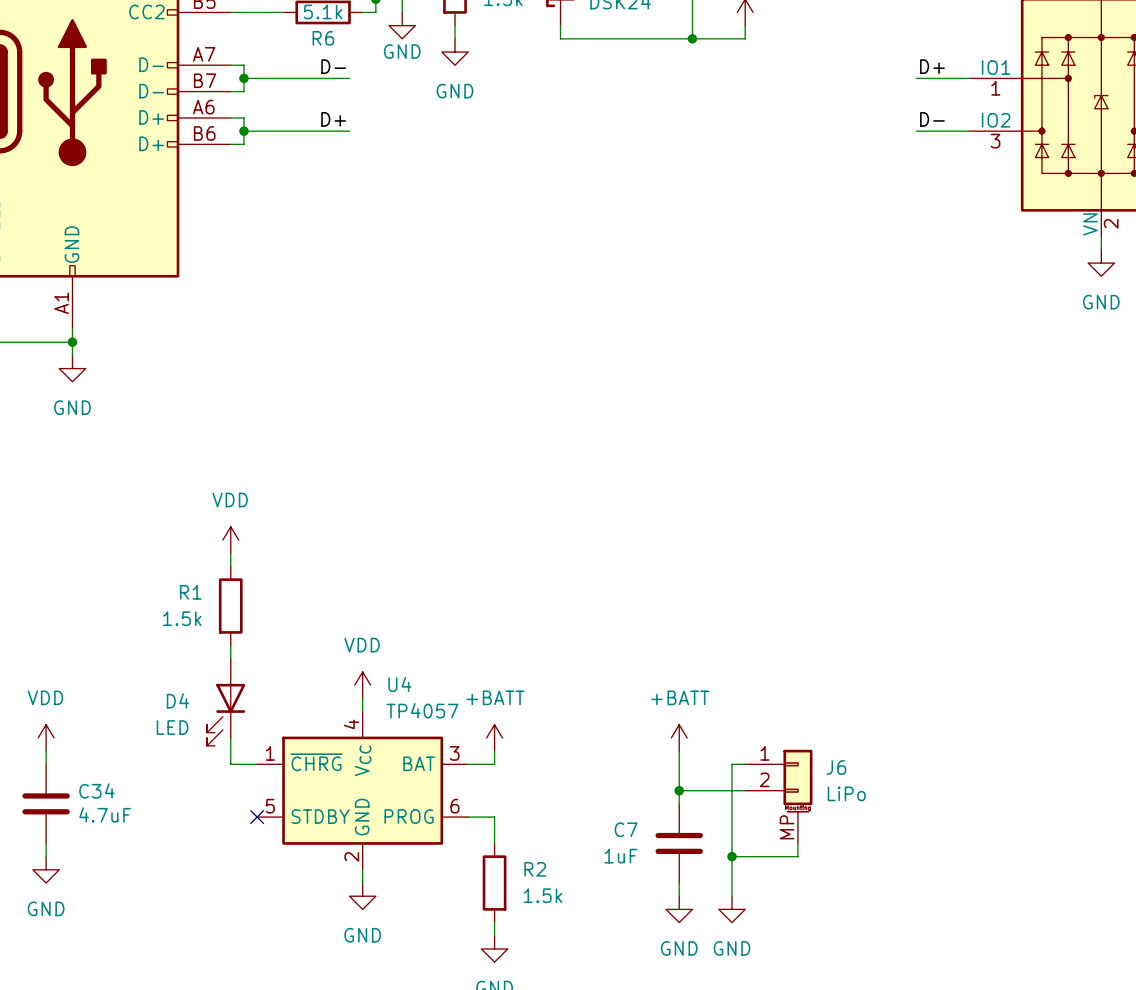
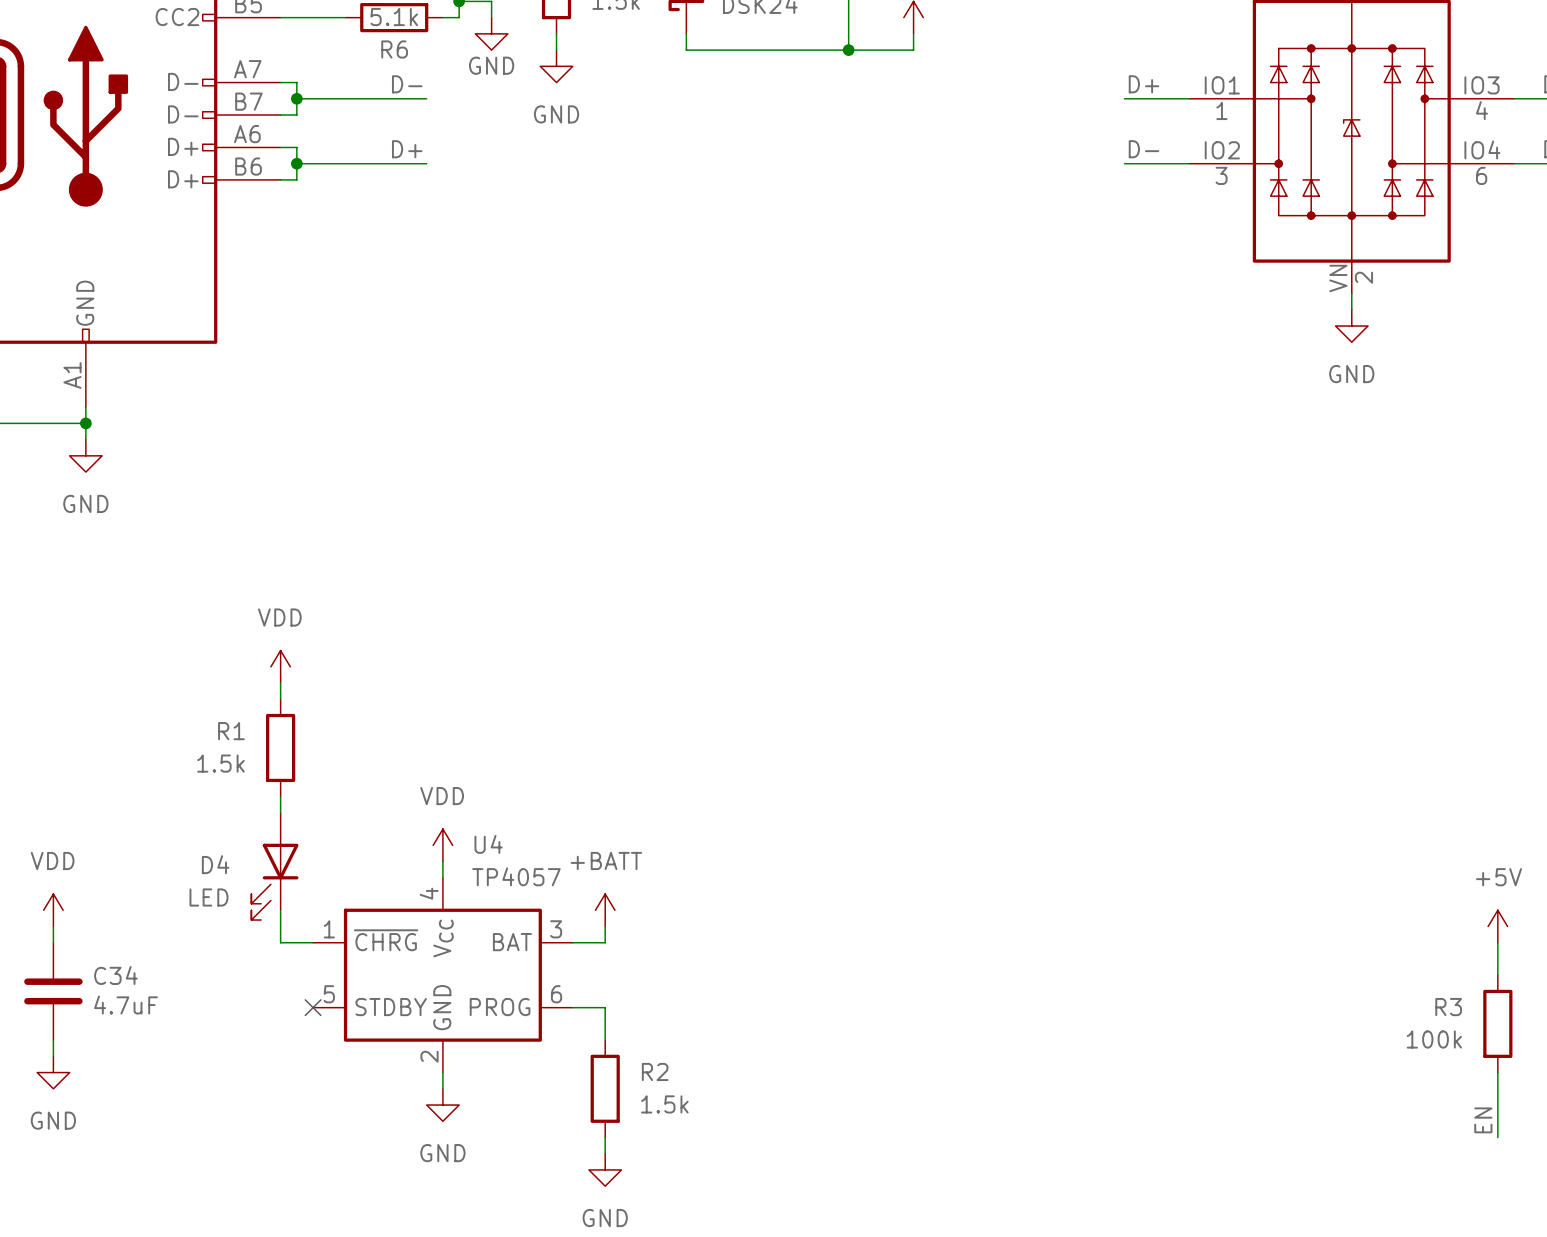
power symbol: +BATT (679, 737) -> none
wire: (679, 751) (679, 803) -> none
wire: (745, 764) (731, 764) (731, 896) -> none
wire: (679, 790) (745, 790) -> none
junction: (679, 790) -> none
J6: LiPo (778, 796) -> none
C7: 1uF (679, 843) -> none
wire: (797, 843) (797, 856) (731, 856) -> none
junction: (731, 856) -> none
wire: (679, 883) (679, 896) -> none
power symbol: GND (679, 909) -> none
power symbol: GND (731, 909) -> none

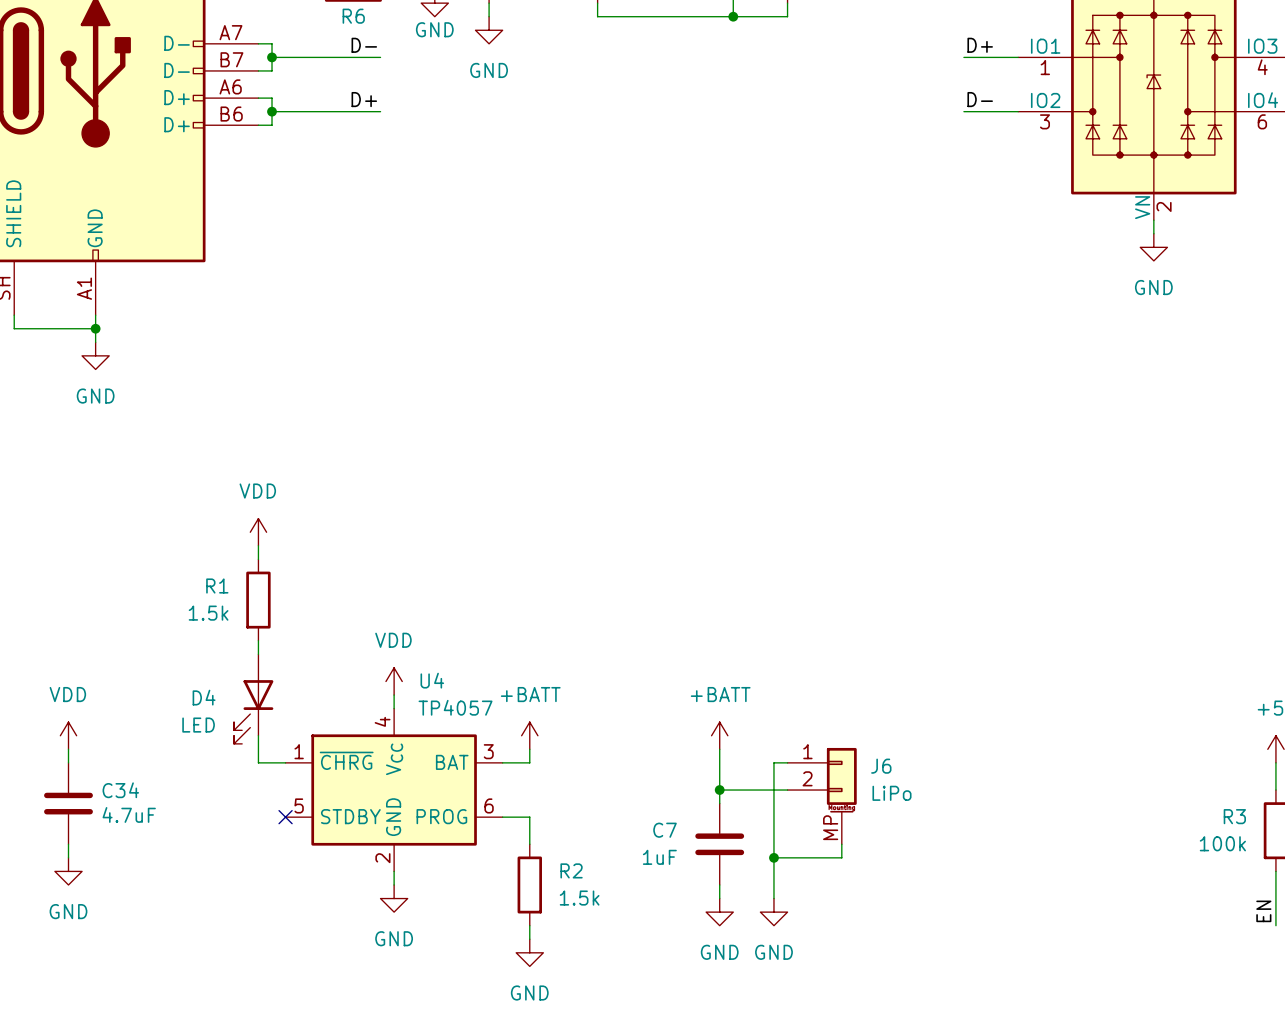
power symbol: none -> +BATT (719, 735)
wire: none -> (719, 749) (719, 803)
wire: none -> (787, 762) (773, 762) (773, 898)
wire: none -> (719, 790) (787, 790)
junction: none -> (719, 790)
J6: none -> LiPo (822, 796)
C7: none -> 1uF (719, 844)
wire: none -> (841, 844) (841, 857) (773, 857)
junction: none -> (773, 857)
wire: none -> (719, 884) (719, 898)
power symbol: none -> GND (719, 912)
power symbol: none -> GND (773, 912)

